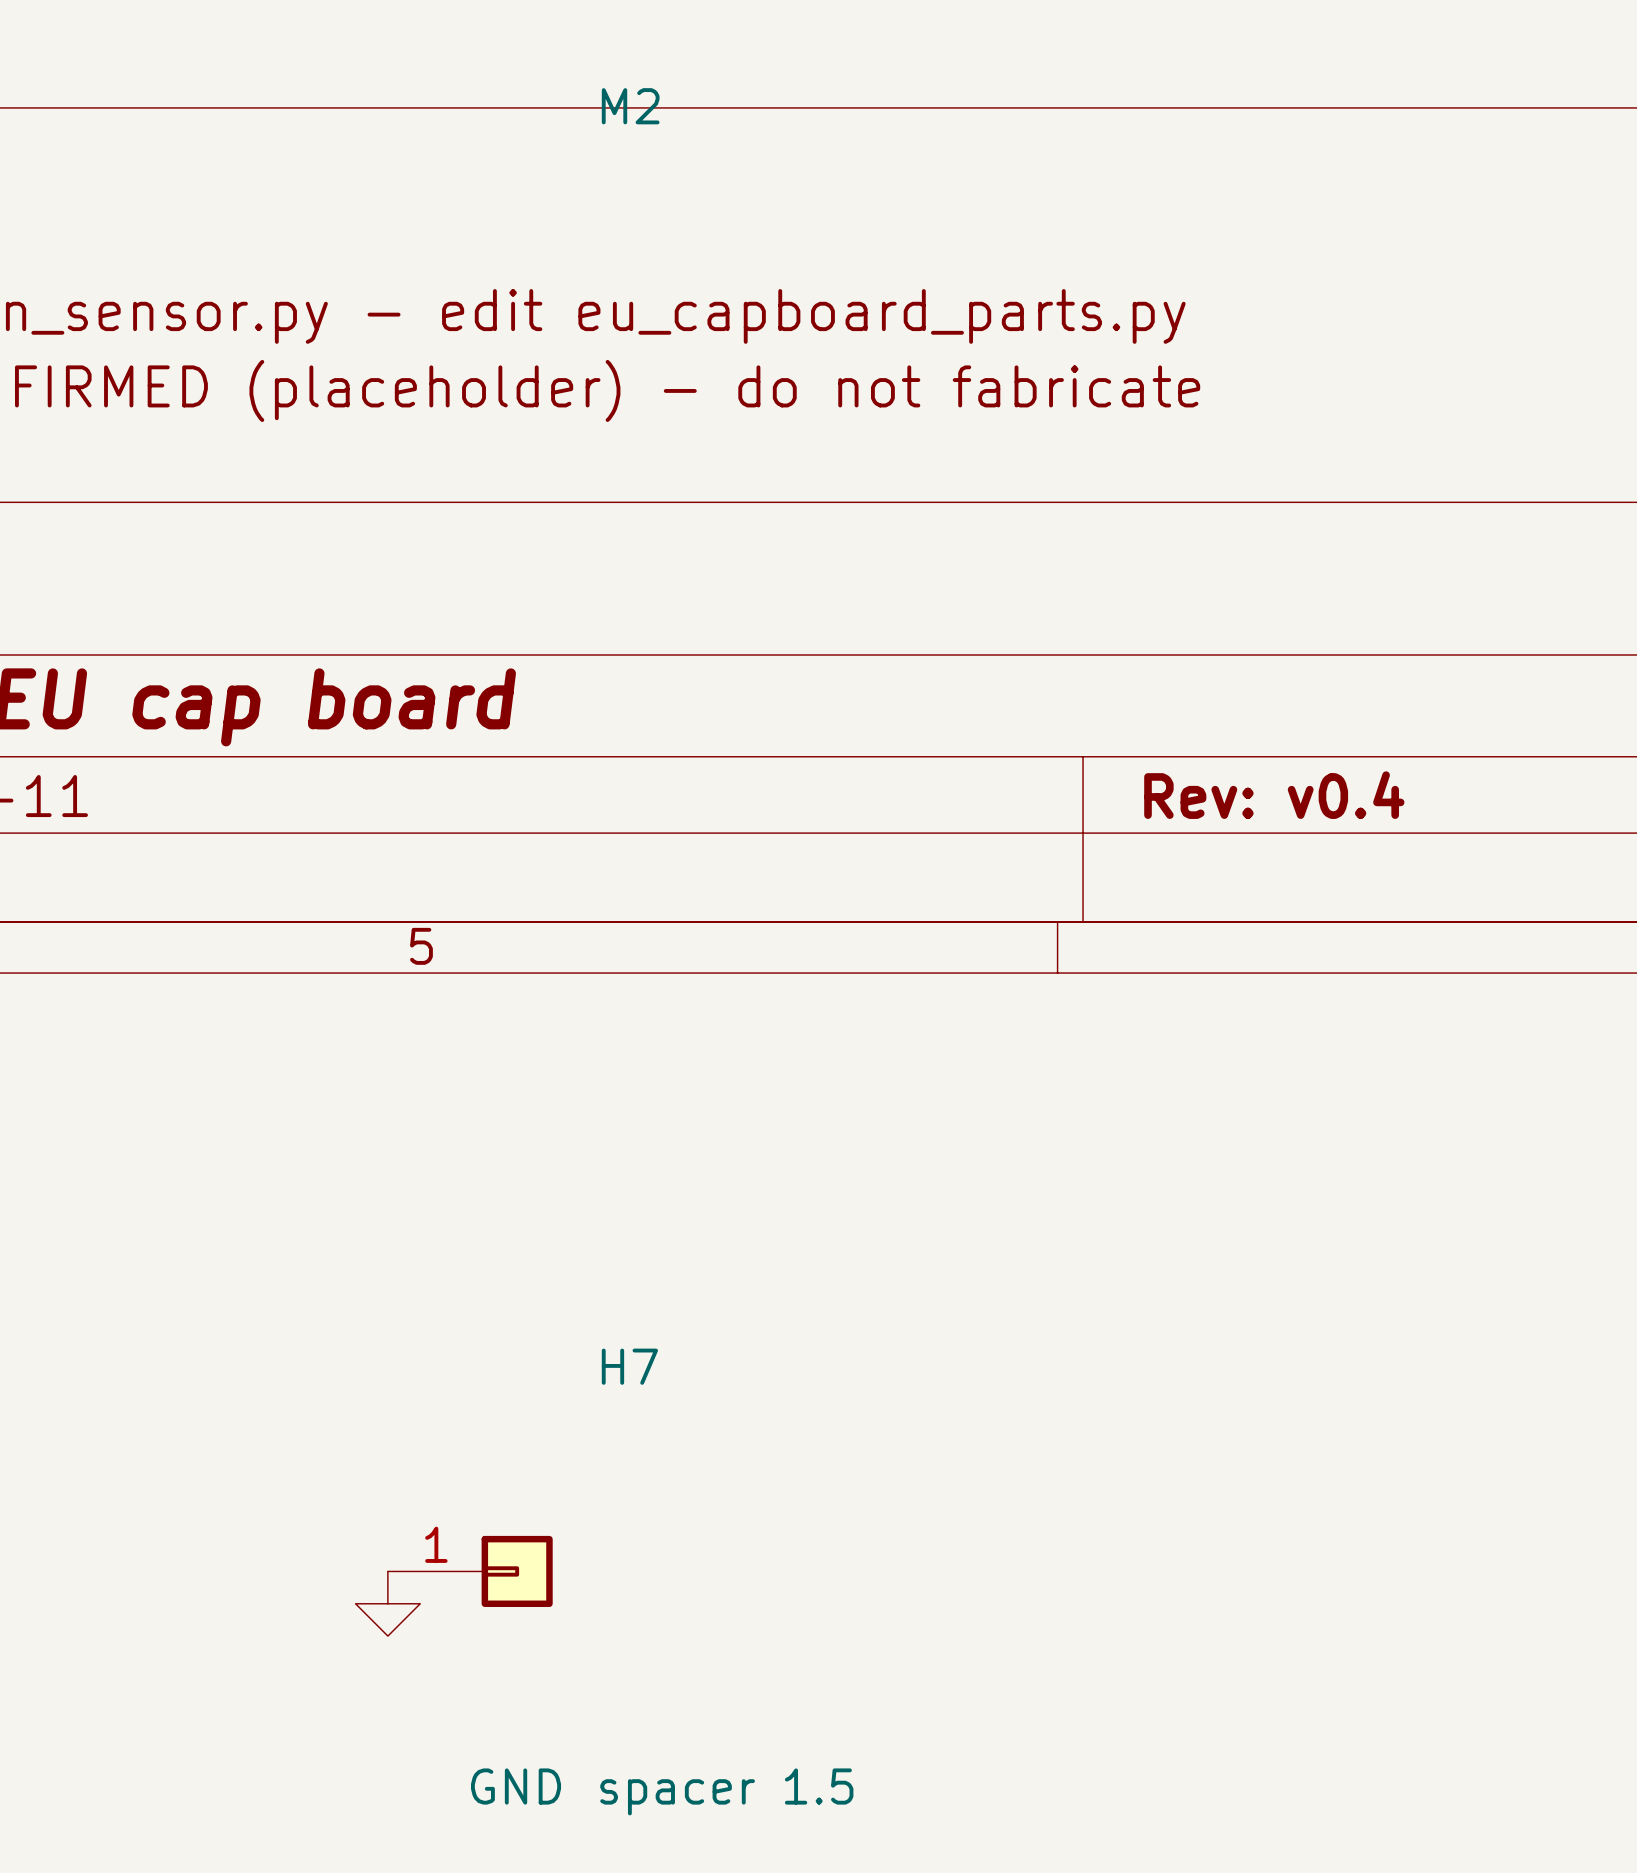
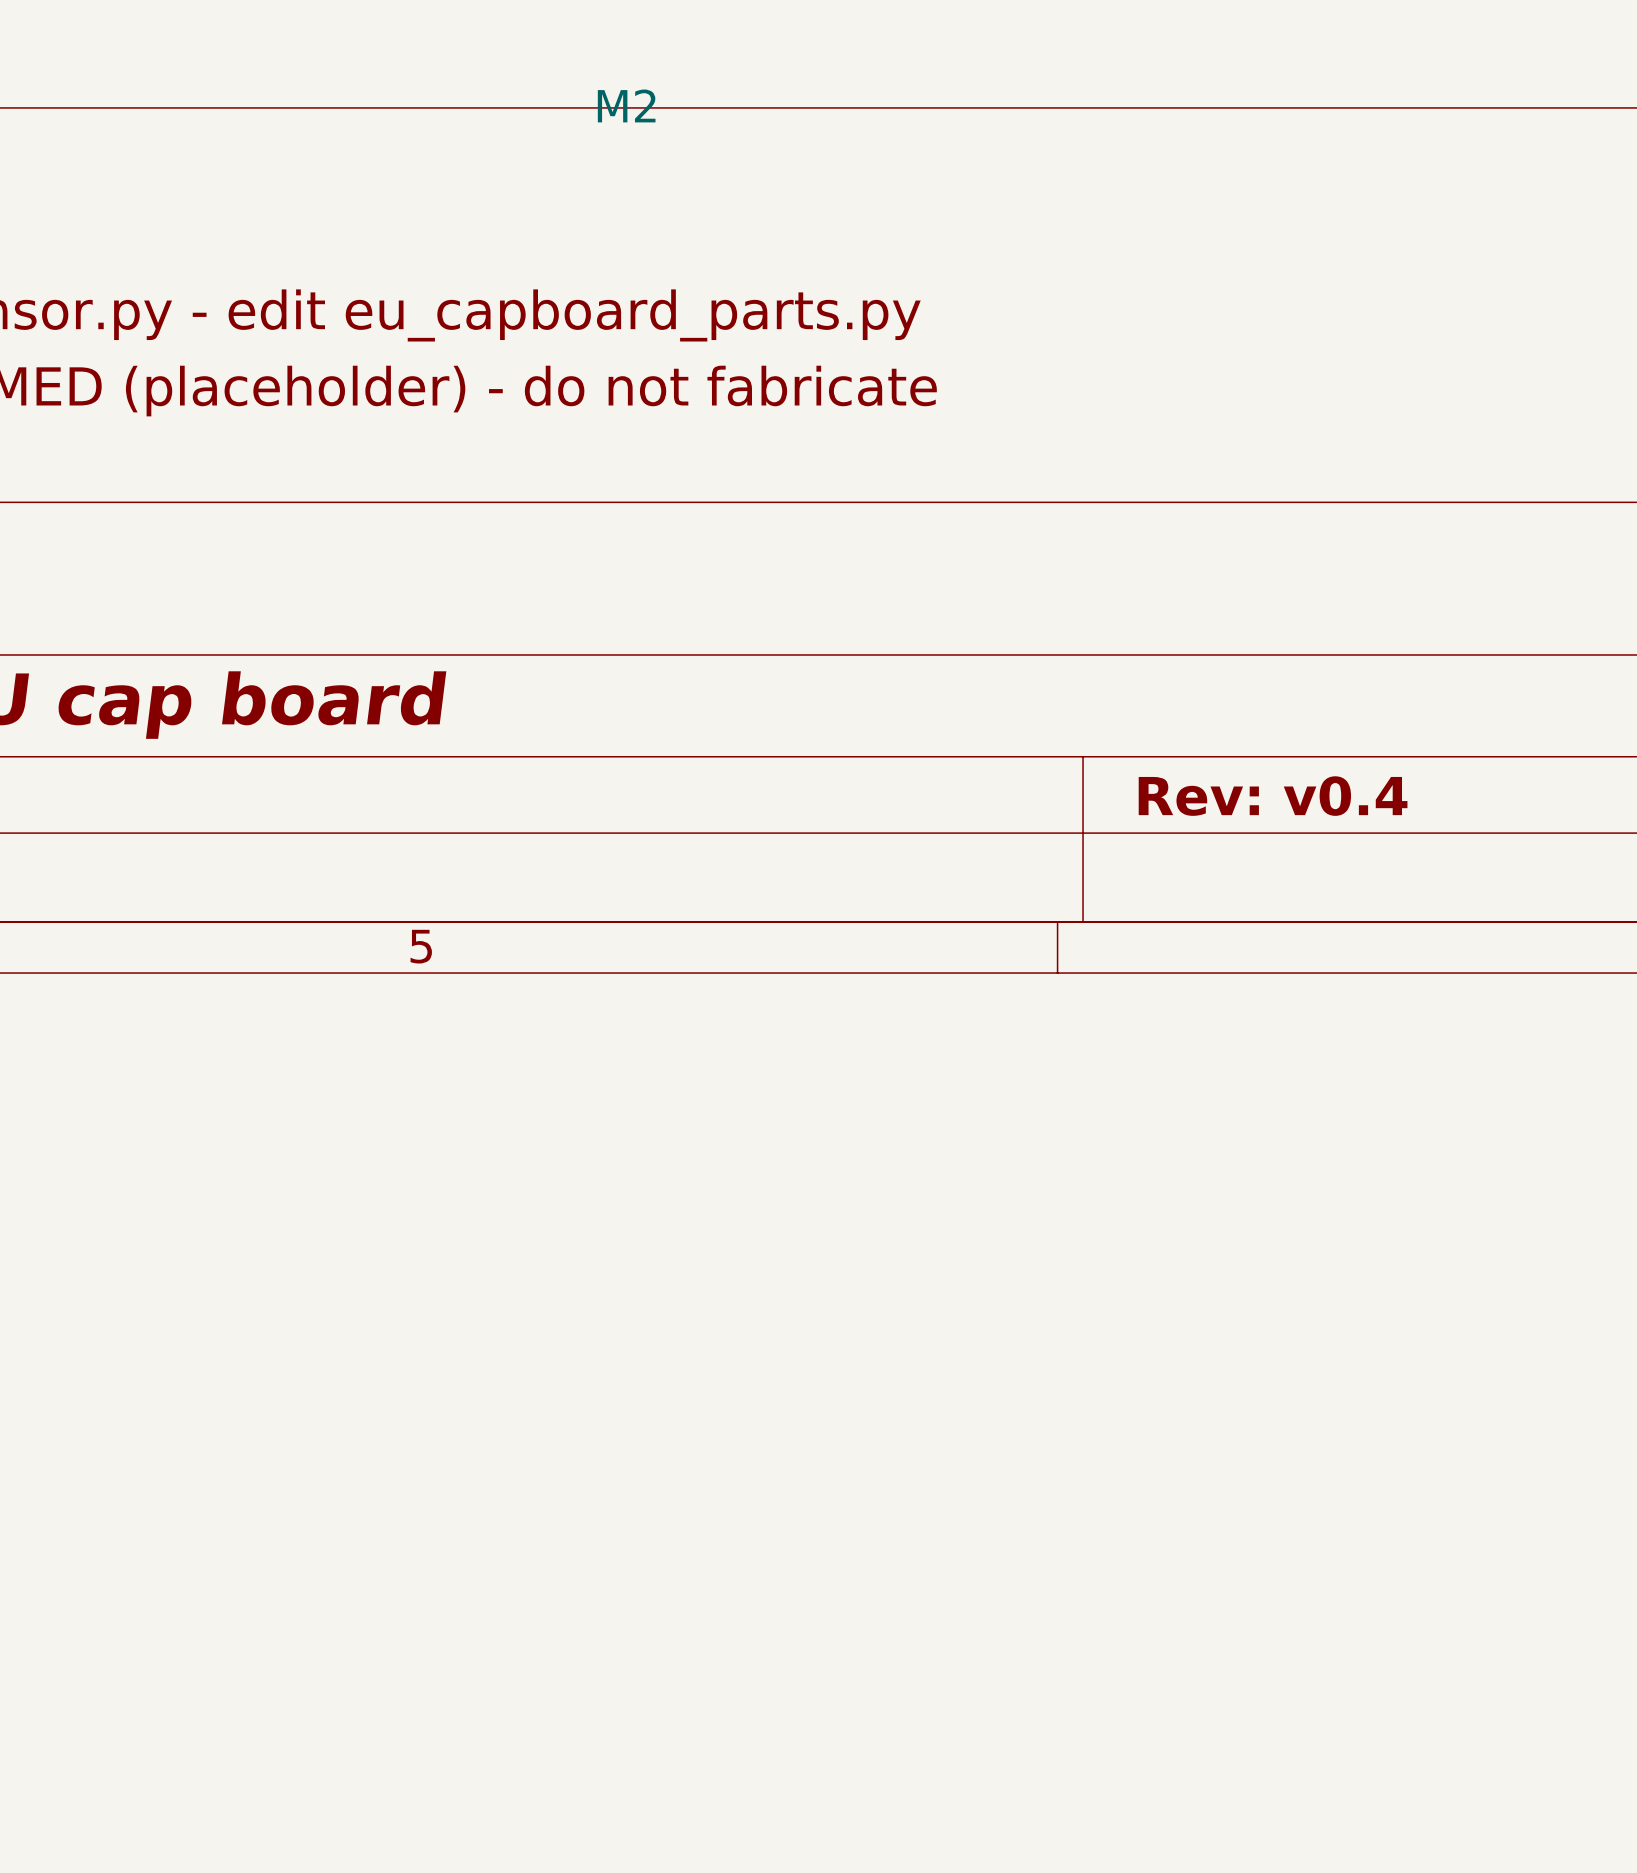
H7: spacer 1.5 (470, 1571) -> none
power symbol: GND (387, 1603) -> none

